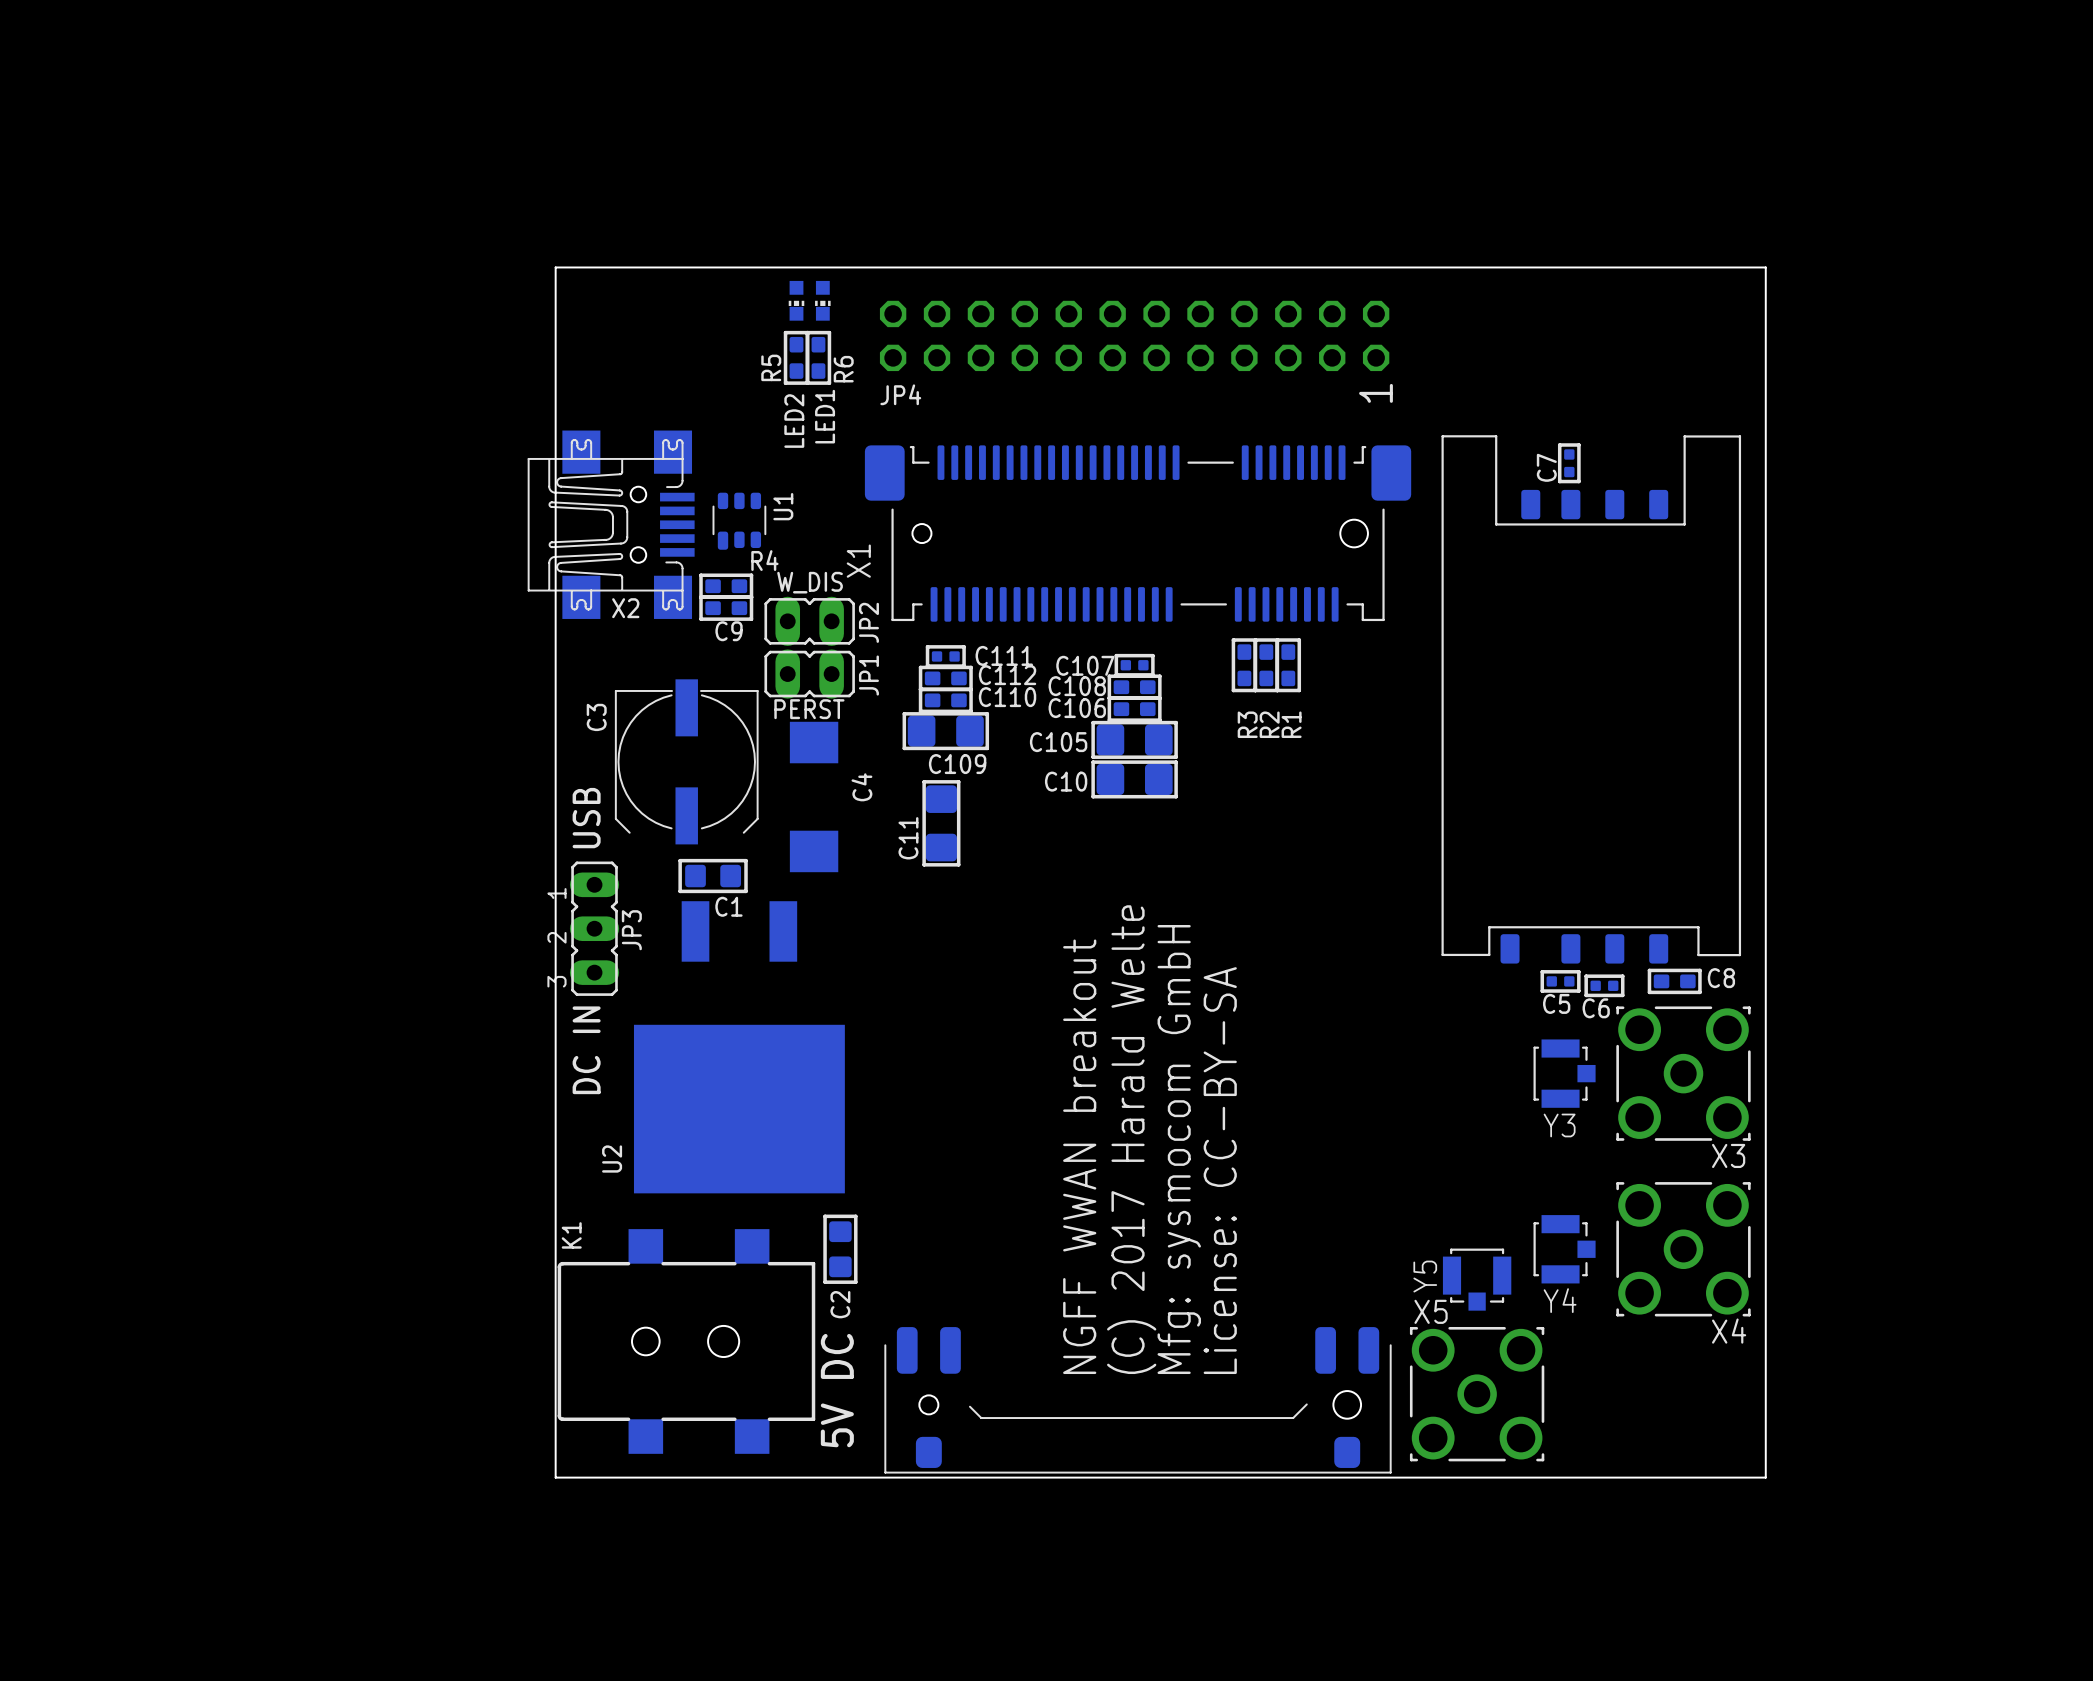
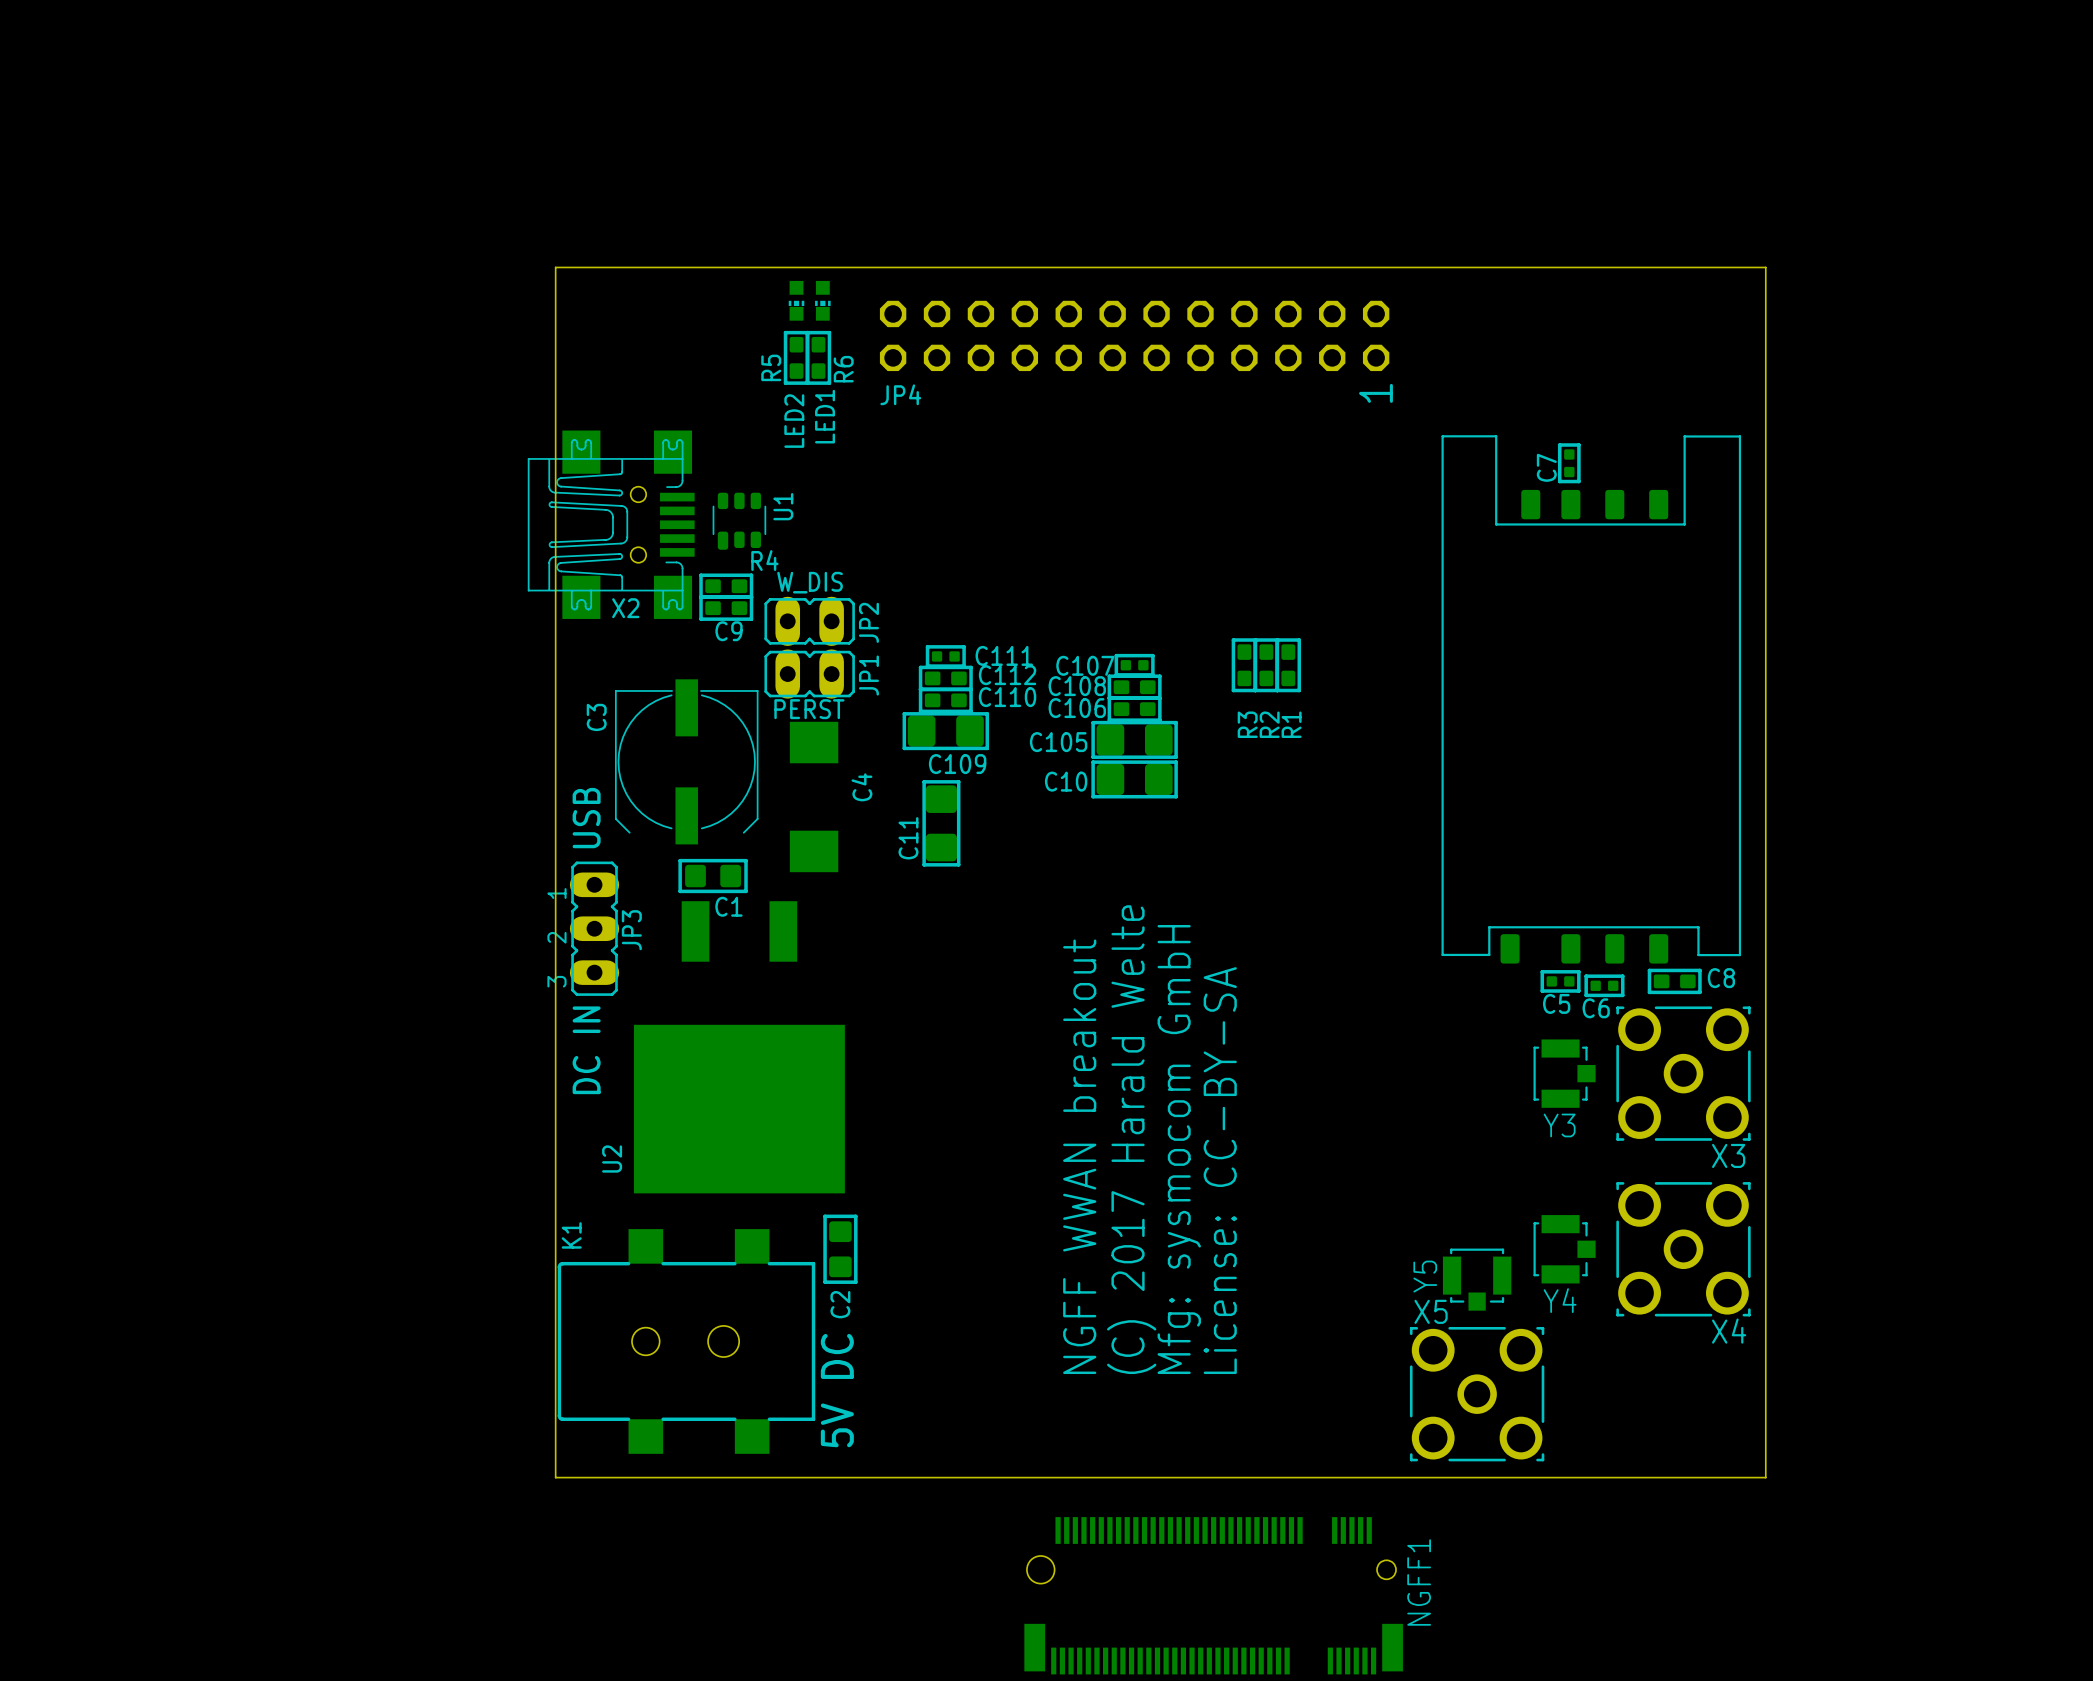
X1: (1138, 959) -> none
NGFF1: none -> (1213, 1595)

